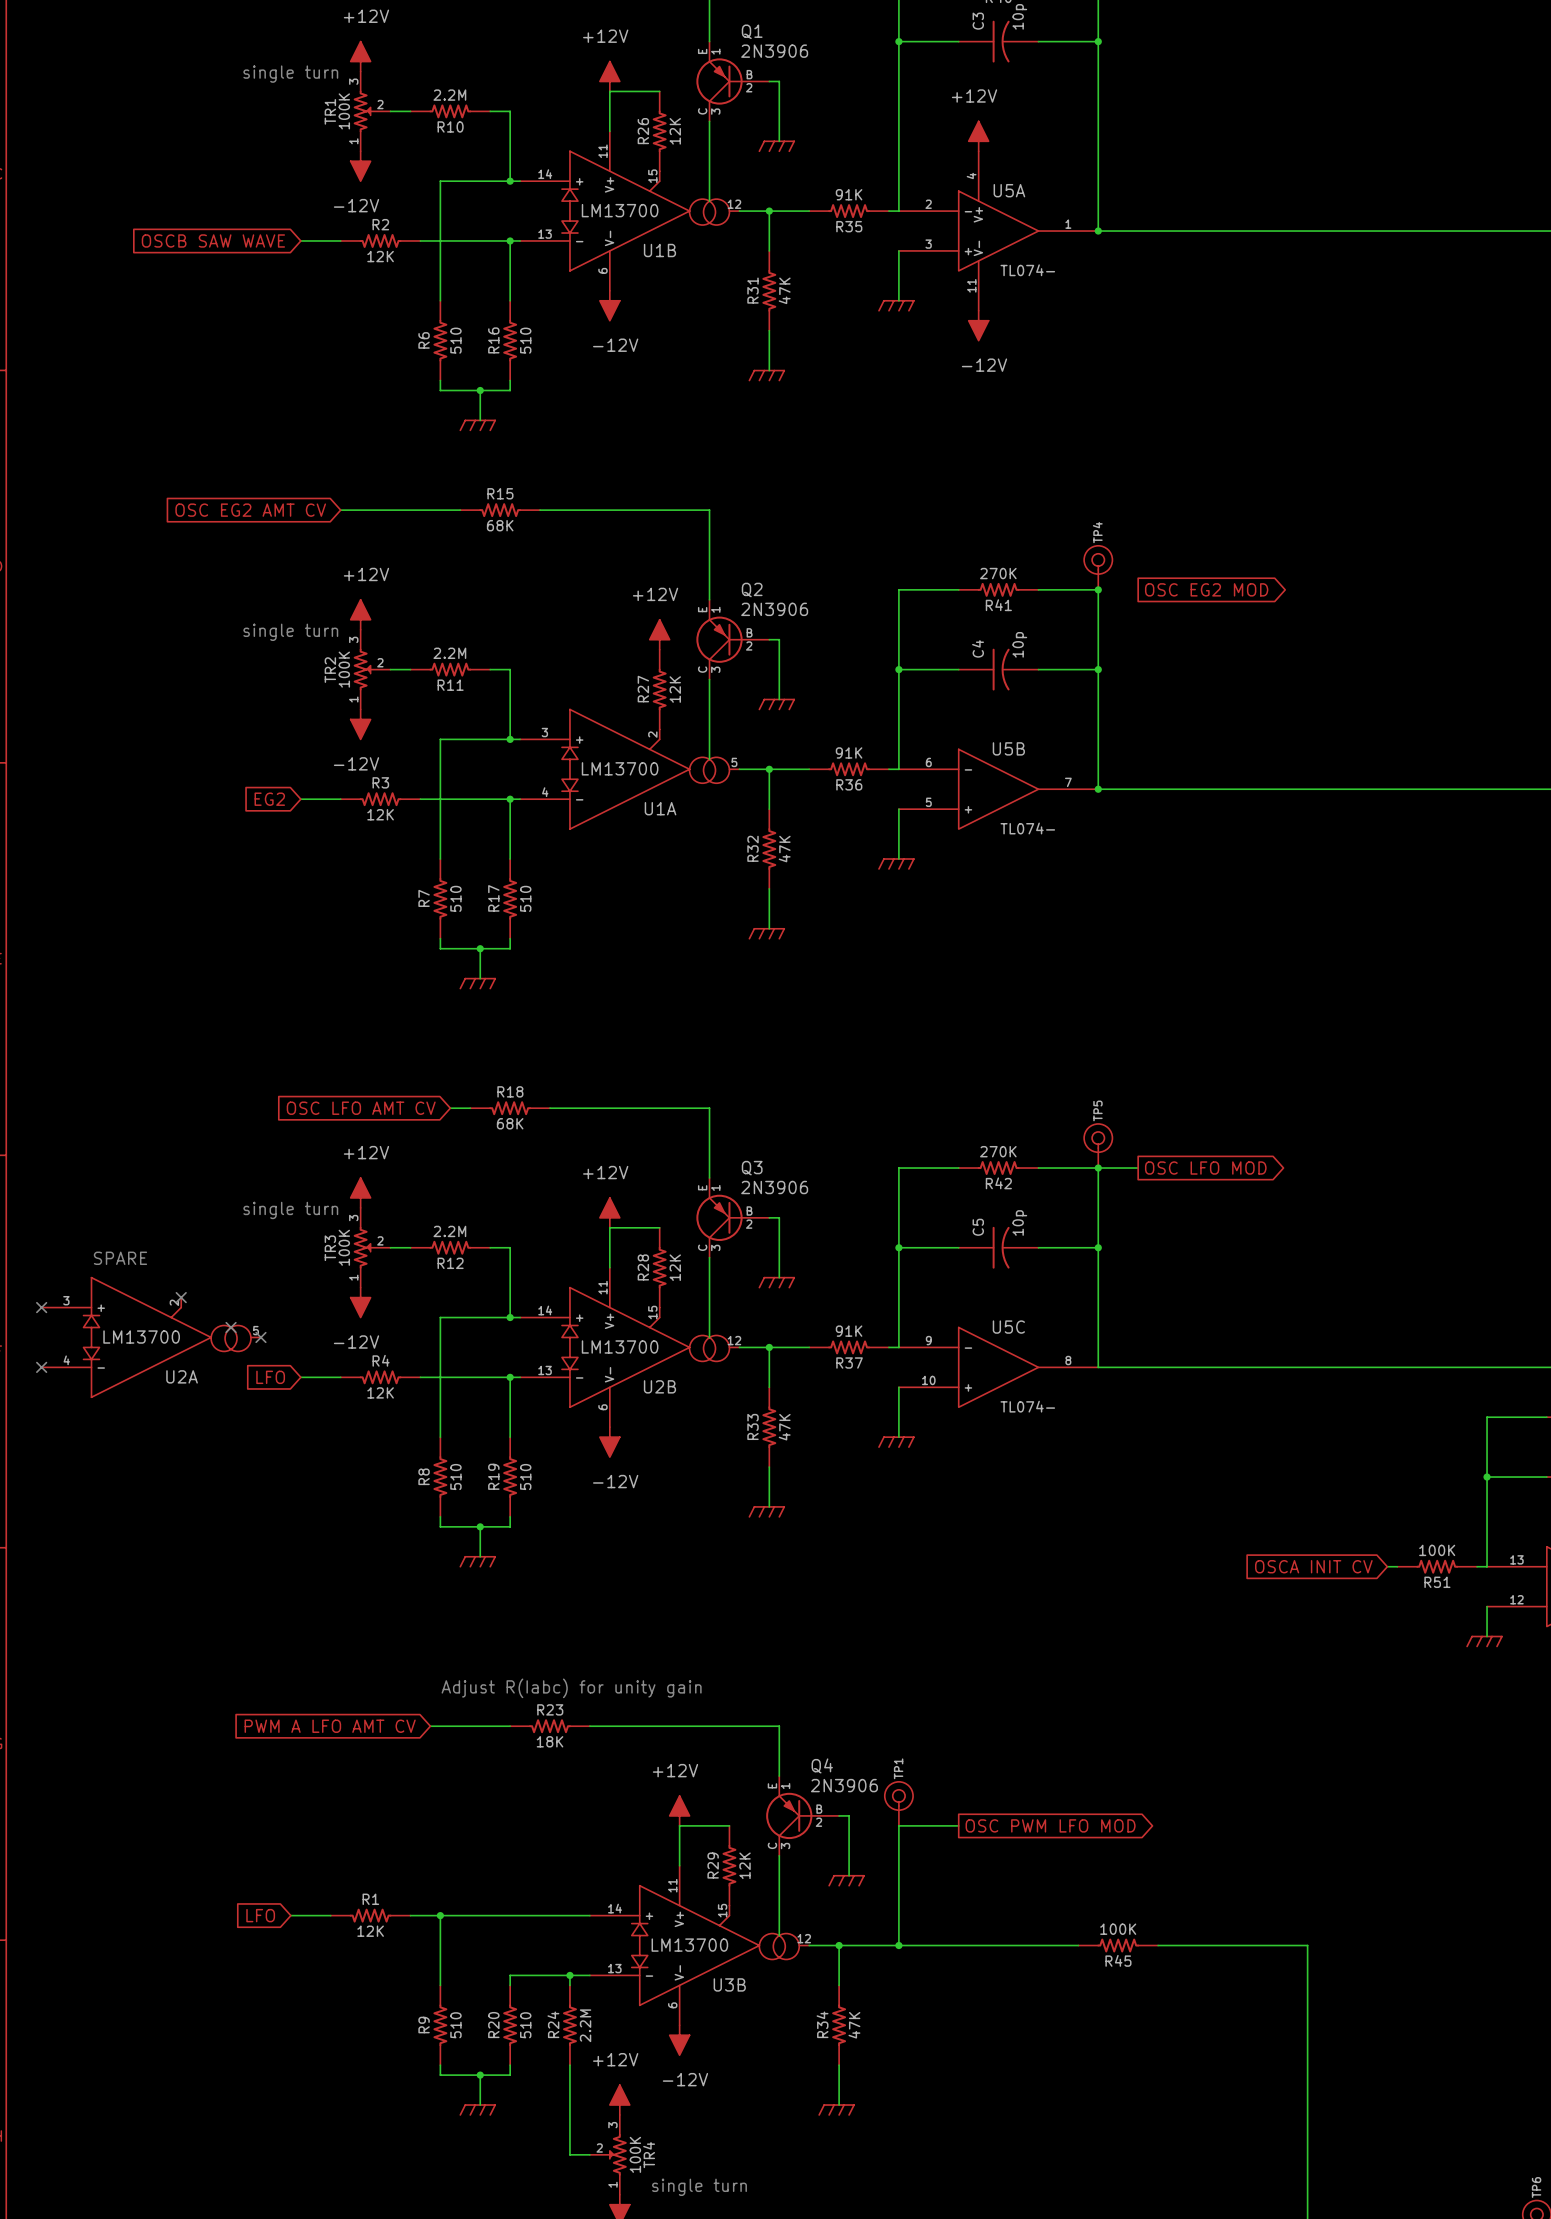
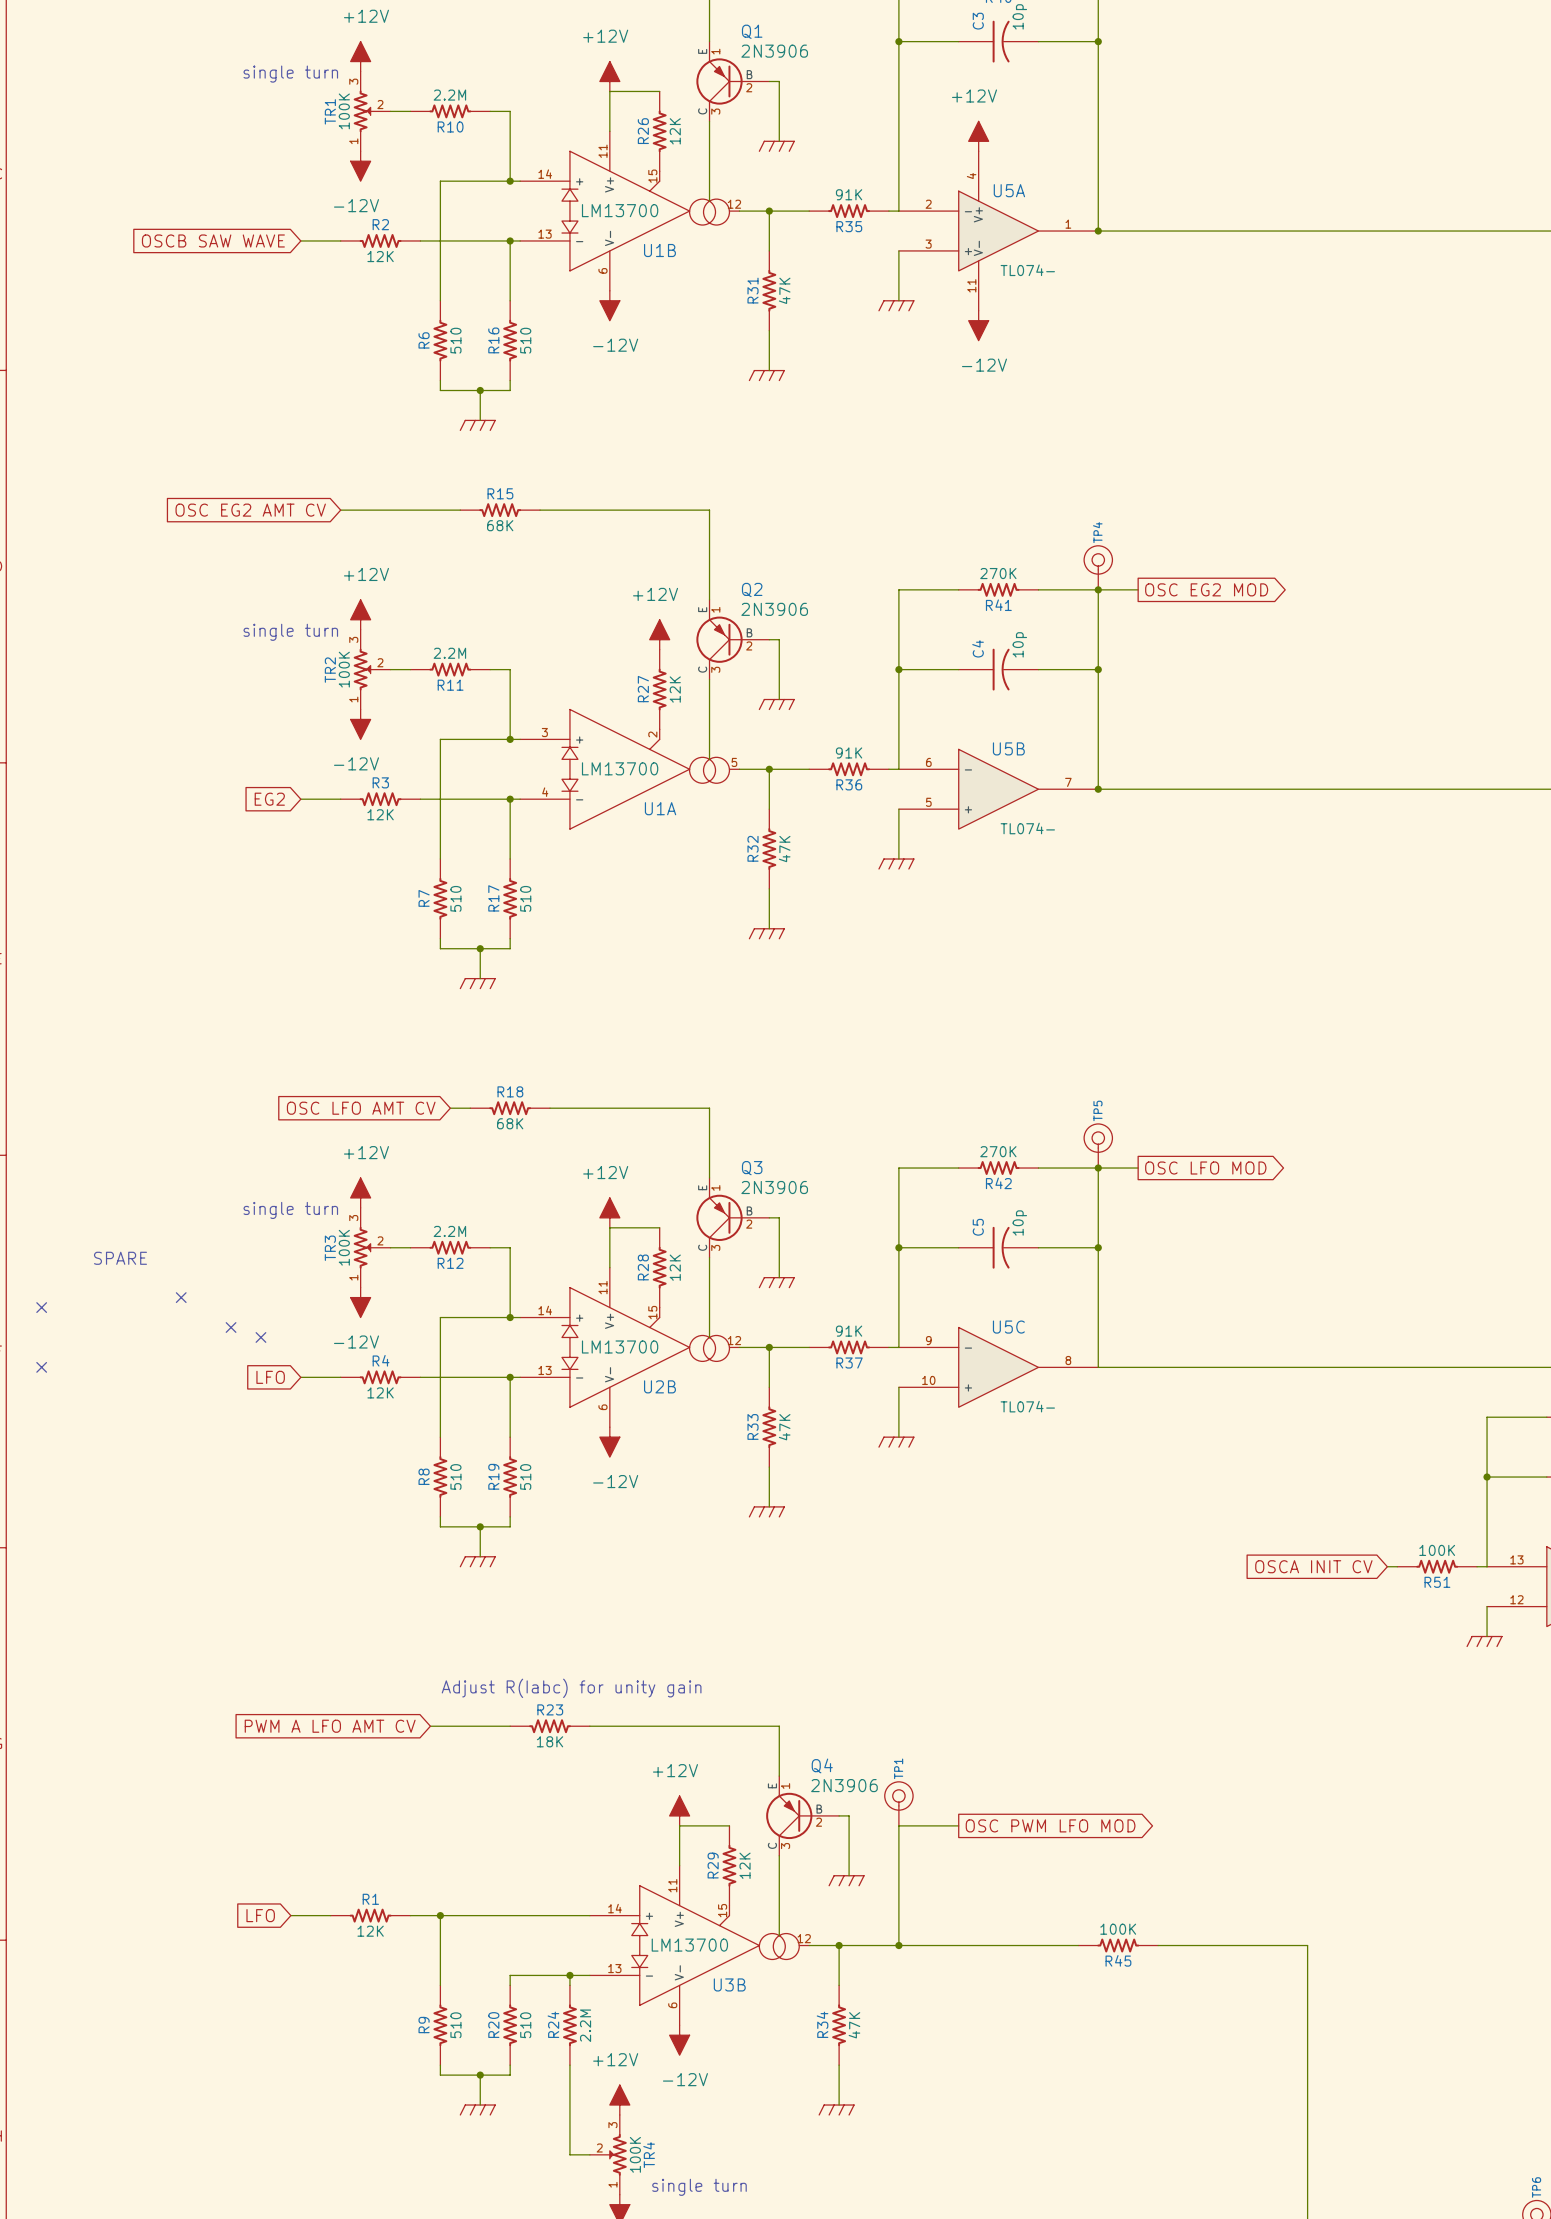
wire: none -> (1098, 589) (1138, 589)
U2A: LM13700 (151, 1337) -> none

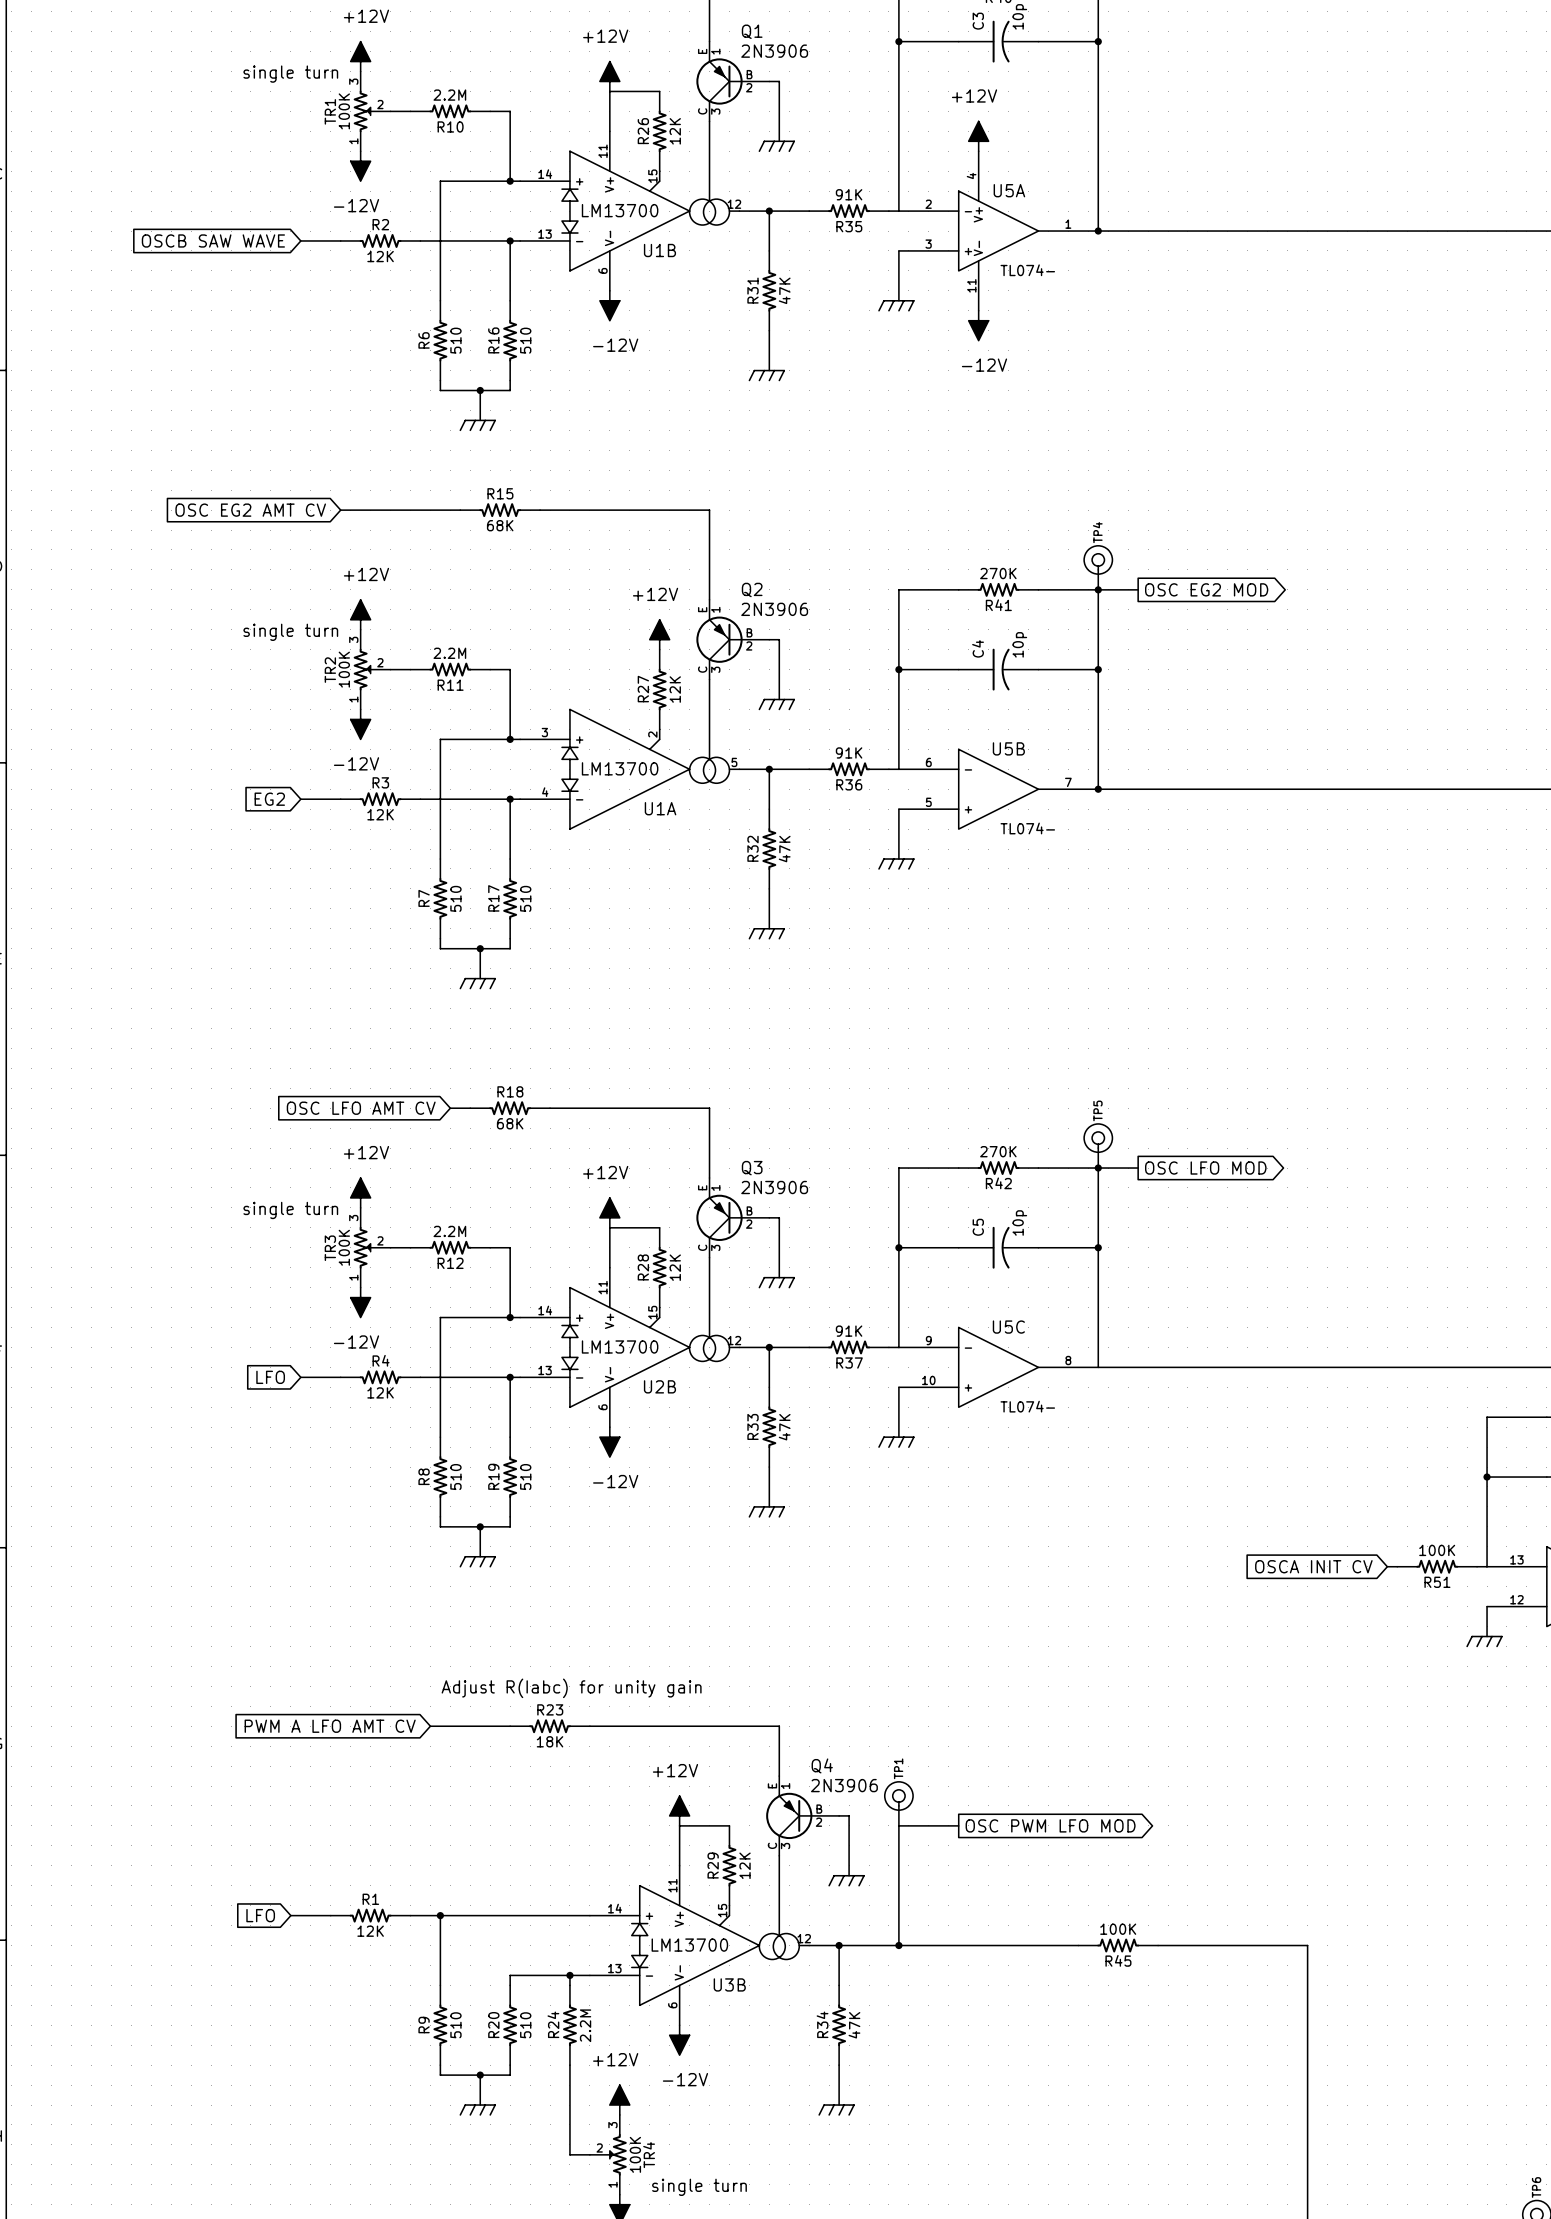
text: SPARE (120, 1258) -> none
no-connect mark: (181, 1297) -> none
no-connect mark: (41, 1307) -> none
no-connect mark: (231, 1327) -> none
no-connect mark: (260, 1337) -> none
no-connect mark: (41, 1367) -> none

